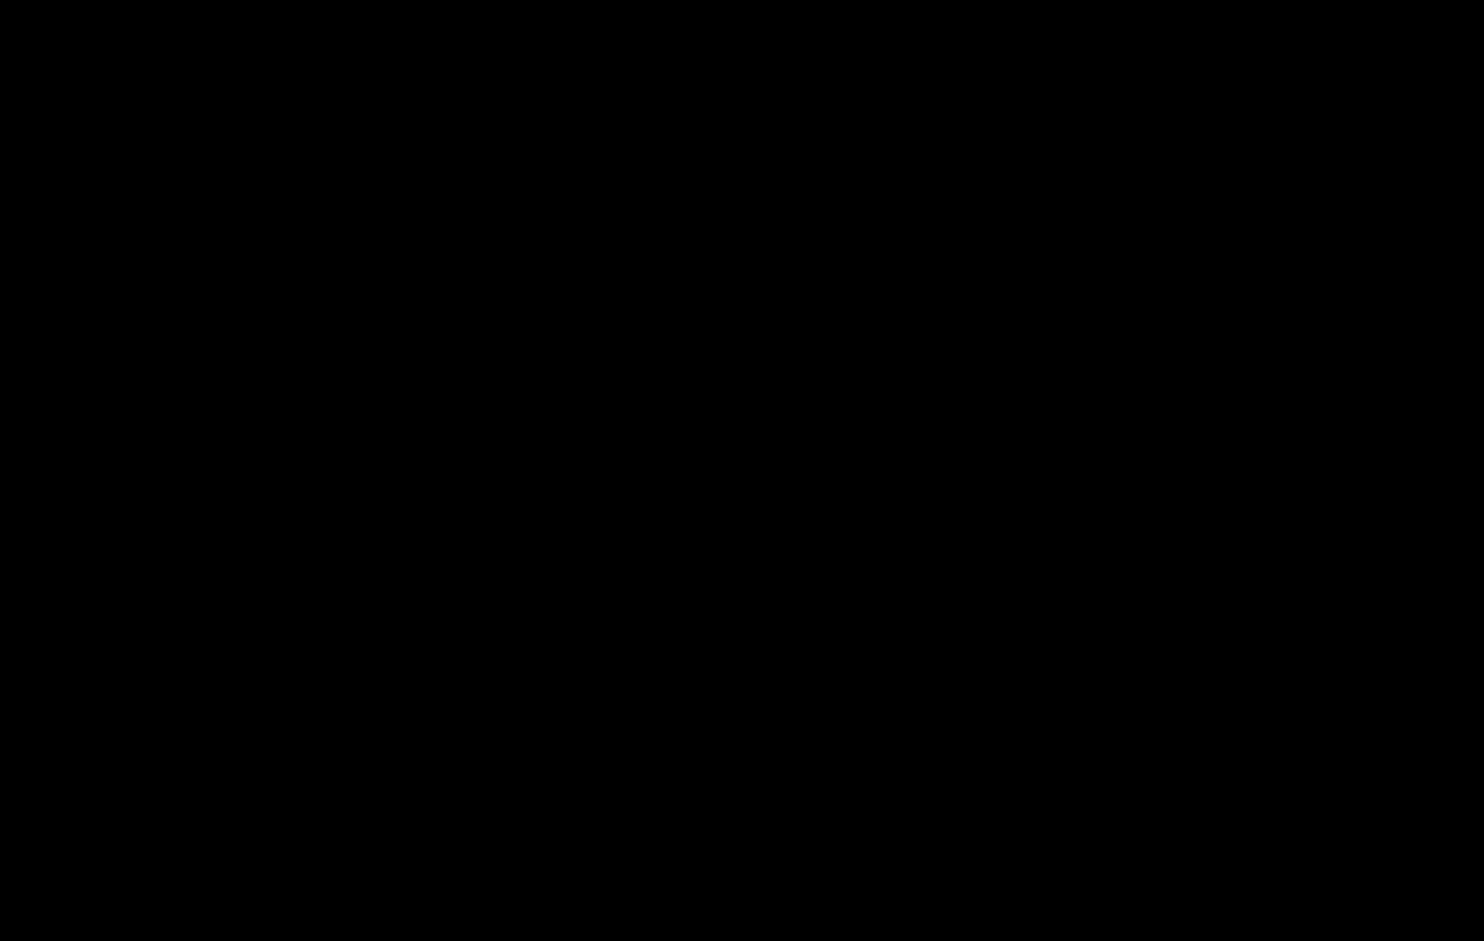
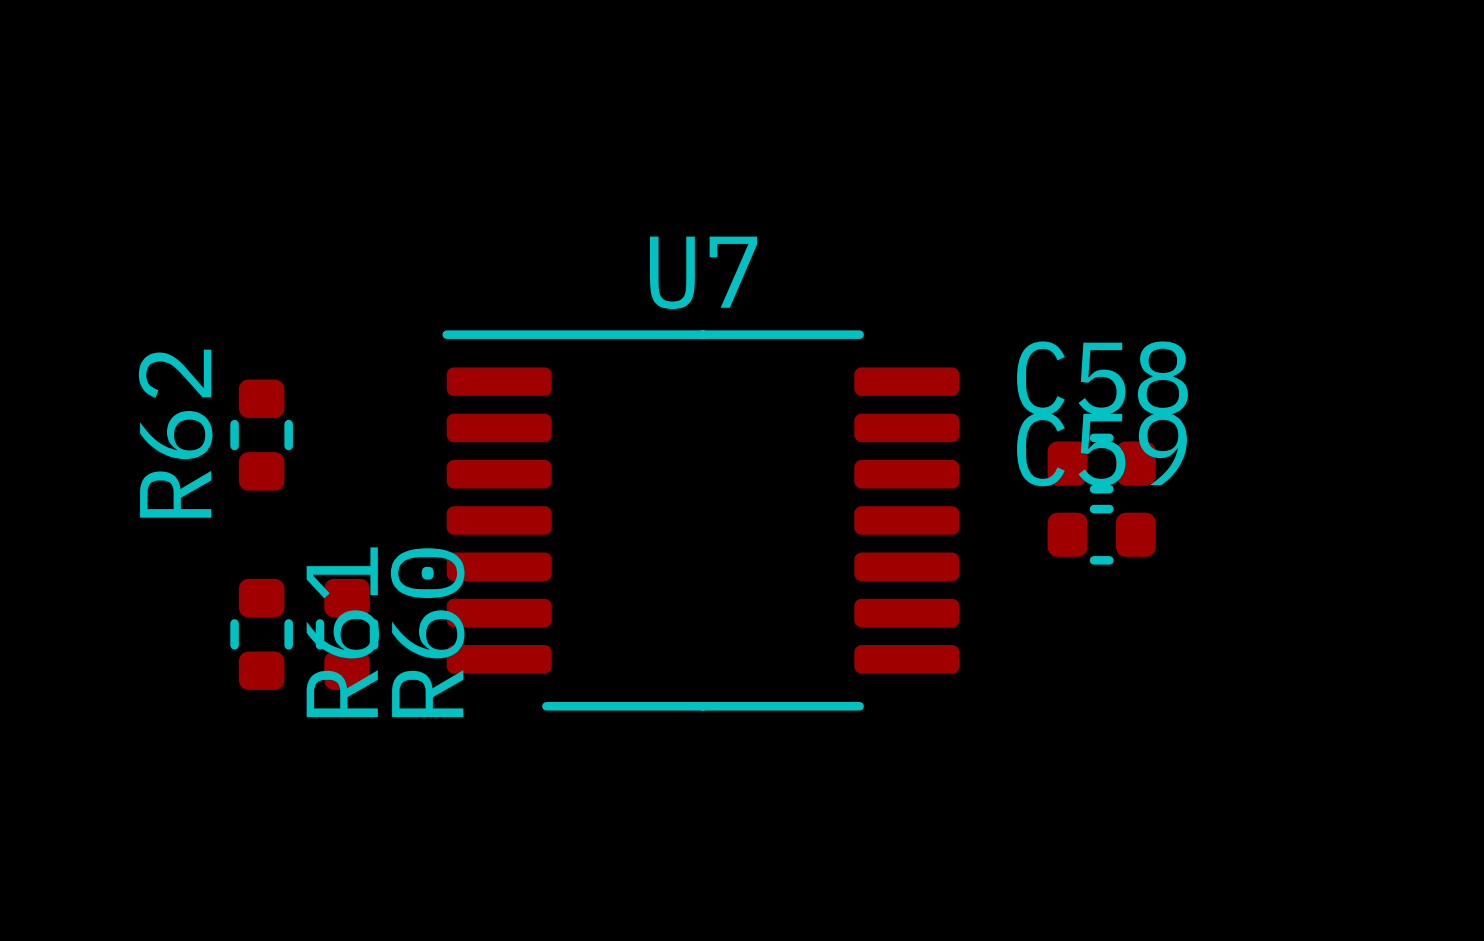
R62: none -> (261, 435)
C58: none -> (1101, 463)
U7: none -> (700, 520)
C59: none -> (1101, 534)
R61: none -> (261, 634)
R60: none -> (347, 634)

